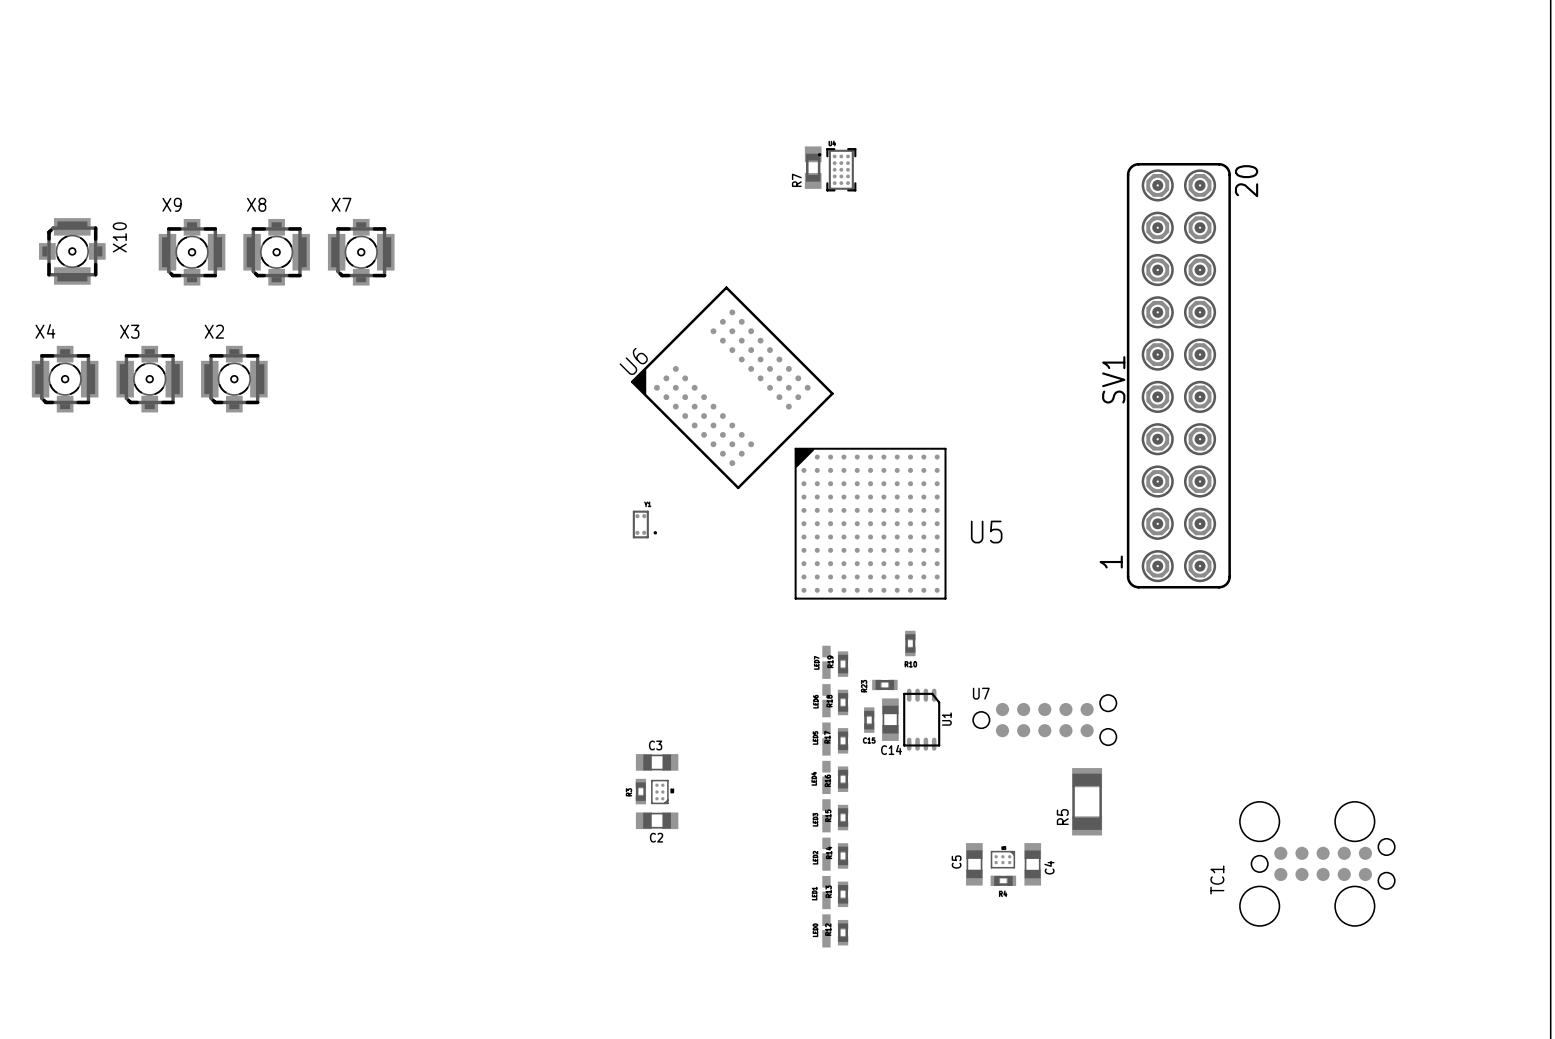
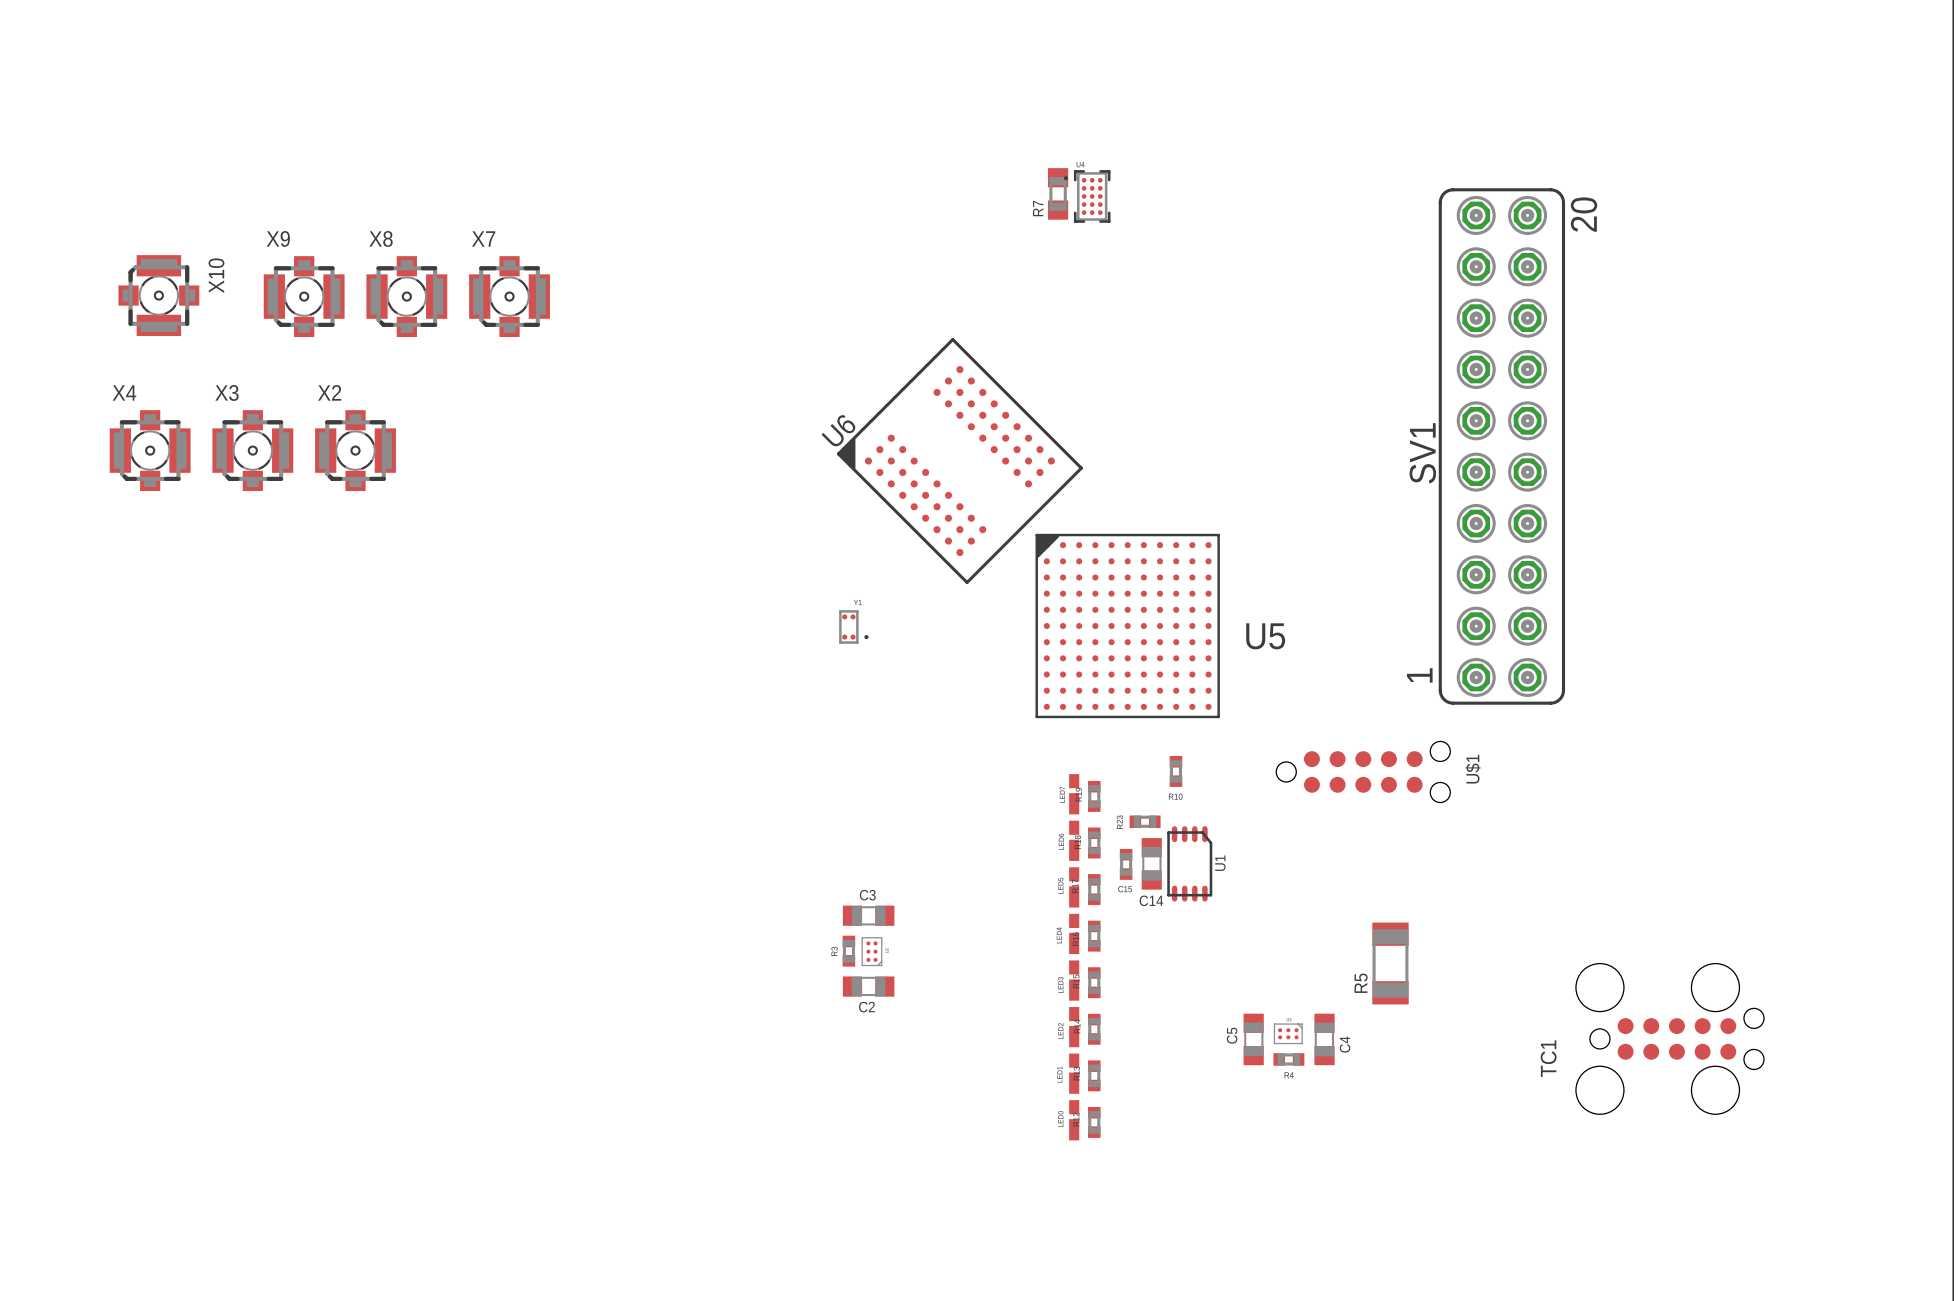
U$1: none -> (1363, 771)
U7: (1044, 720) -> none

